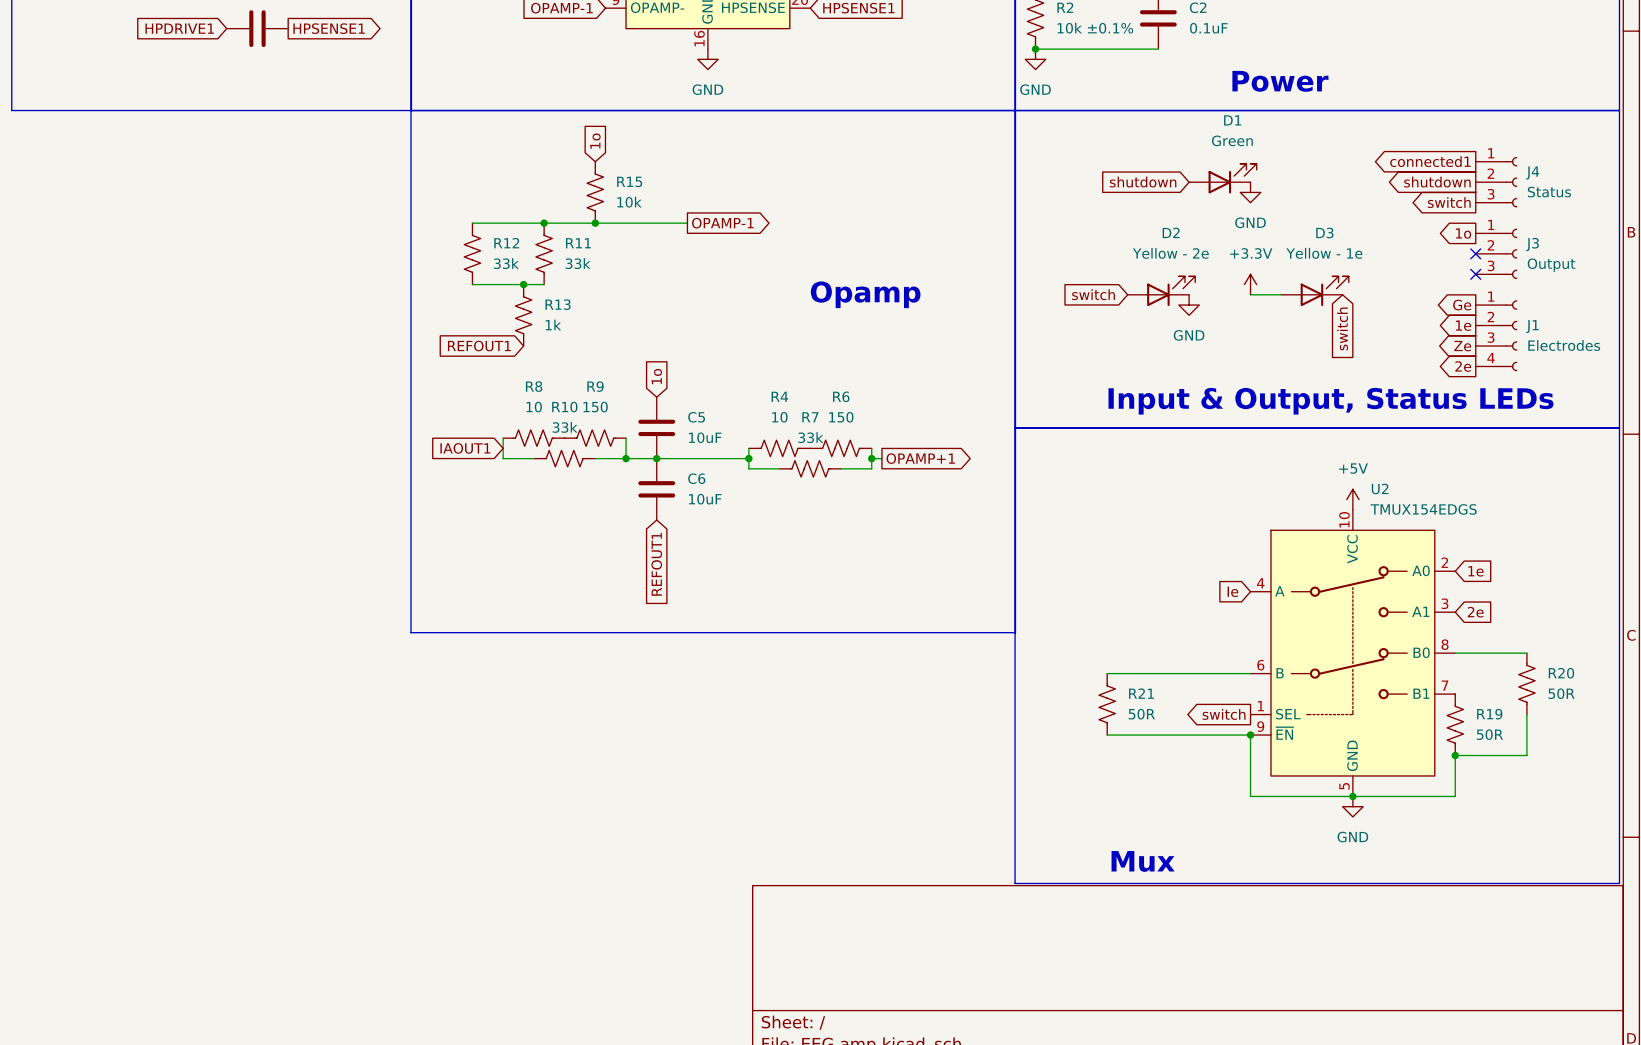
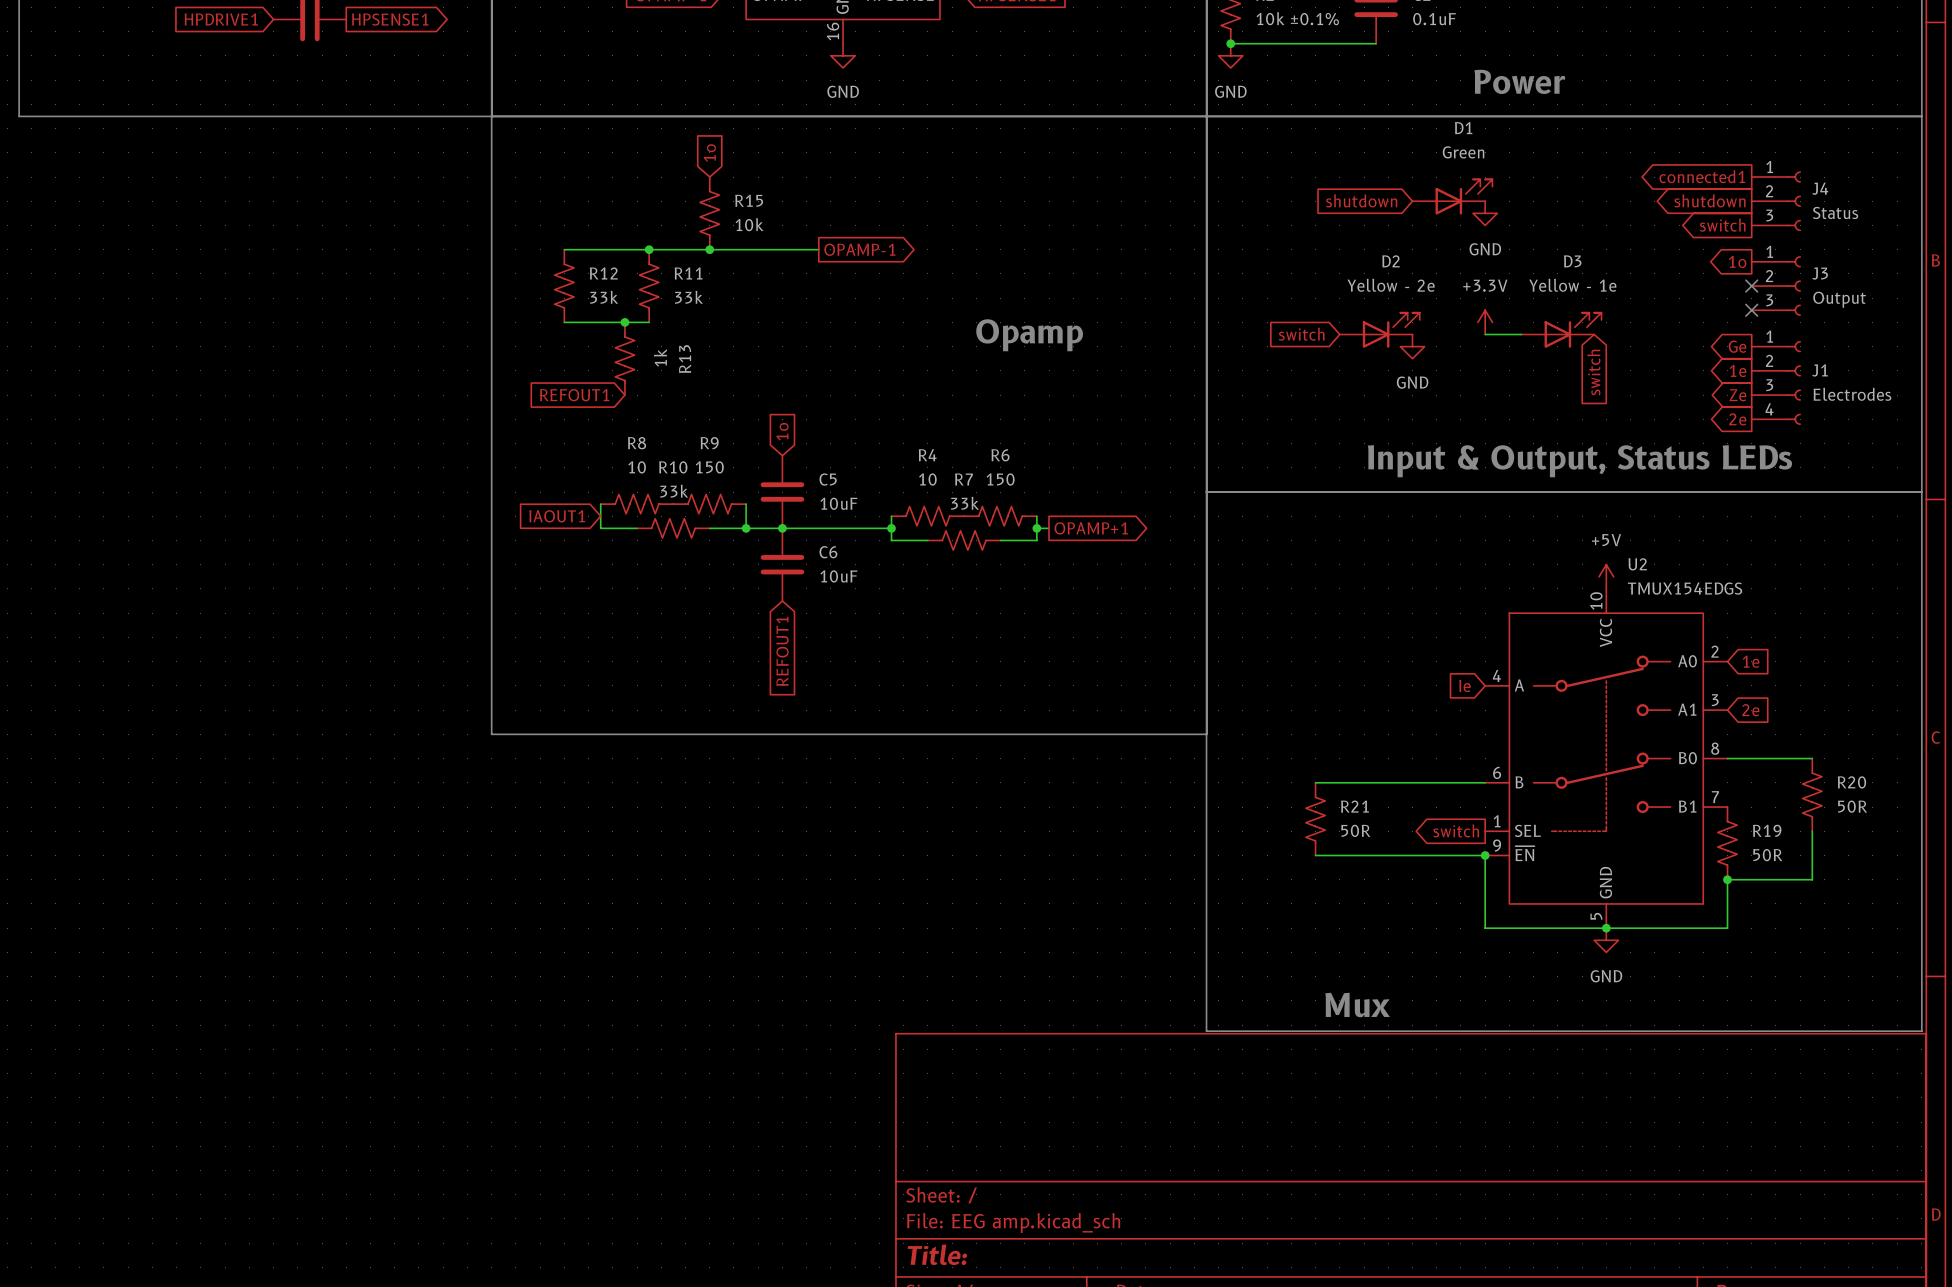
R13 name rotation: 0° (558, 304) -> 90° counterclockwise (685, 359)
R13 value rotation: 0° (553, 324) -> 90° counterclockwise (660, 357)

